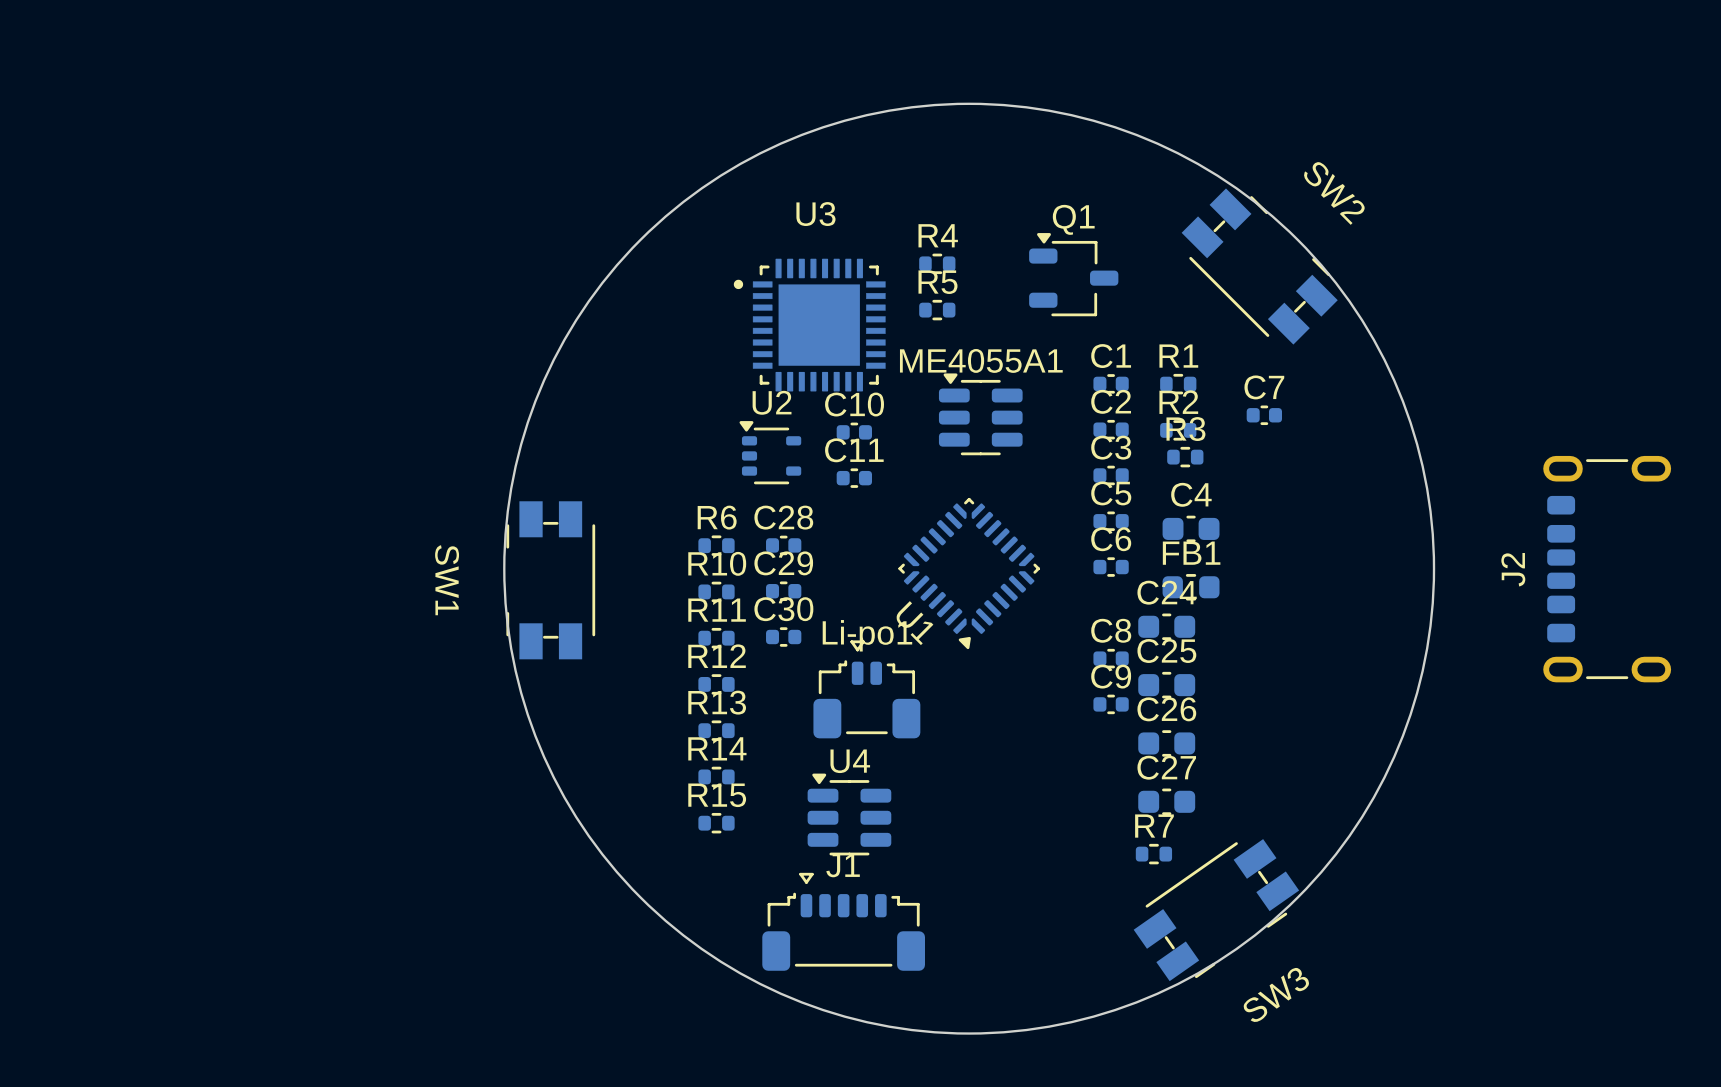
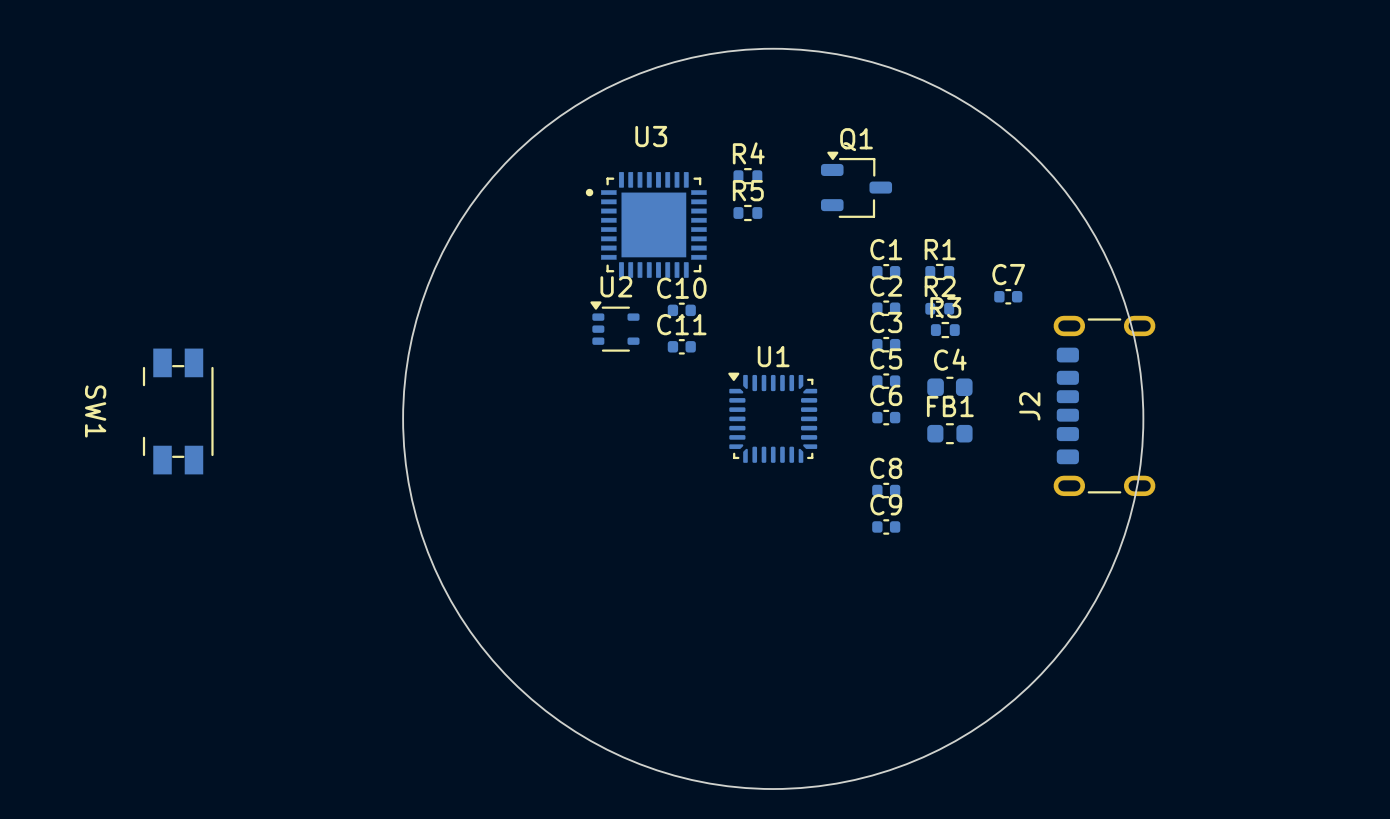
SW2: (1259, 266) -> none
ME4055A1: (980, 414) -> none
R6: (716, 545) -> none
C28: (783, 545) -> none
J2 position: (1607, 569) -> (1104, 405)
U1 rotation: 0° (969, 573) -> 135° clockwise (772, 417)
SW1 position: (550, 580) -> (178, 411)
R10: (716, 591) -> none
C29: (783, 591) -> none
C24: (1166, 626) -> none
C30: (783, 637) -> none
R11: (716, 638) -> none
R12: (716, 684) -> none
C25: (1166, 685) -> none
Li-po1: (866, 689) -> none
R13: (716, 730) -> none
C26: (1166, 743) -> none
R14: (716, 776) -> none
C27: (1166, 801) -> none
U4: (849, 814) -> none
R15: (716, 823) -> none
R7: (1153, 854) -> none
SW3: (1216, 910) -> none
J1: (843, 921) -> none

